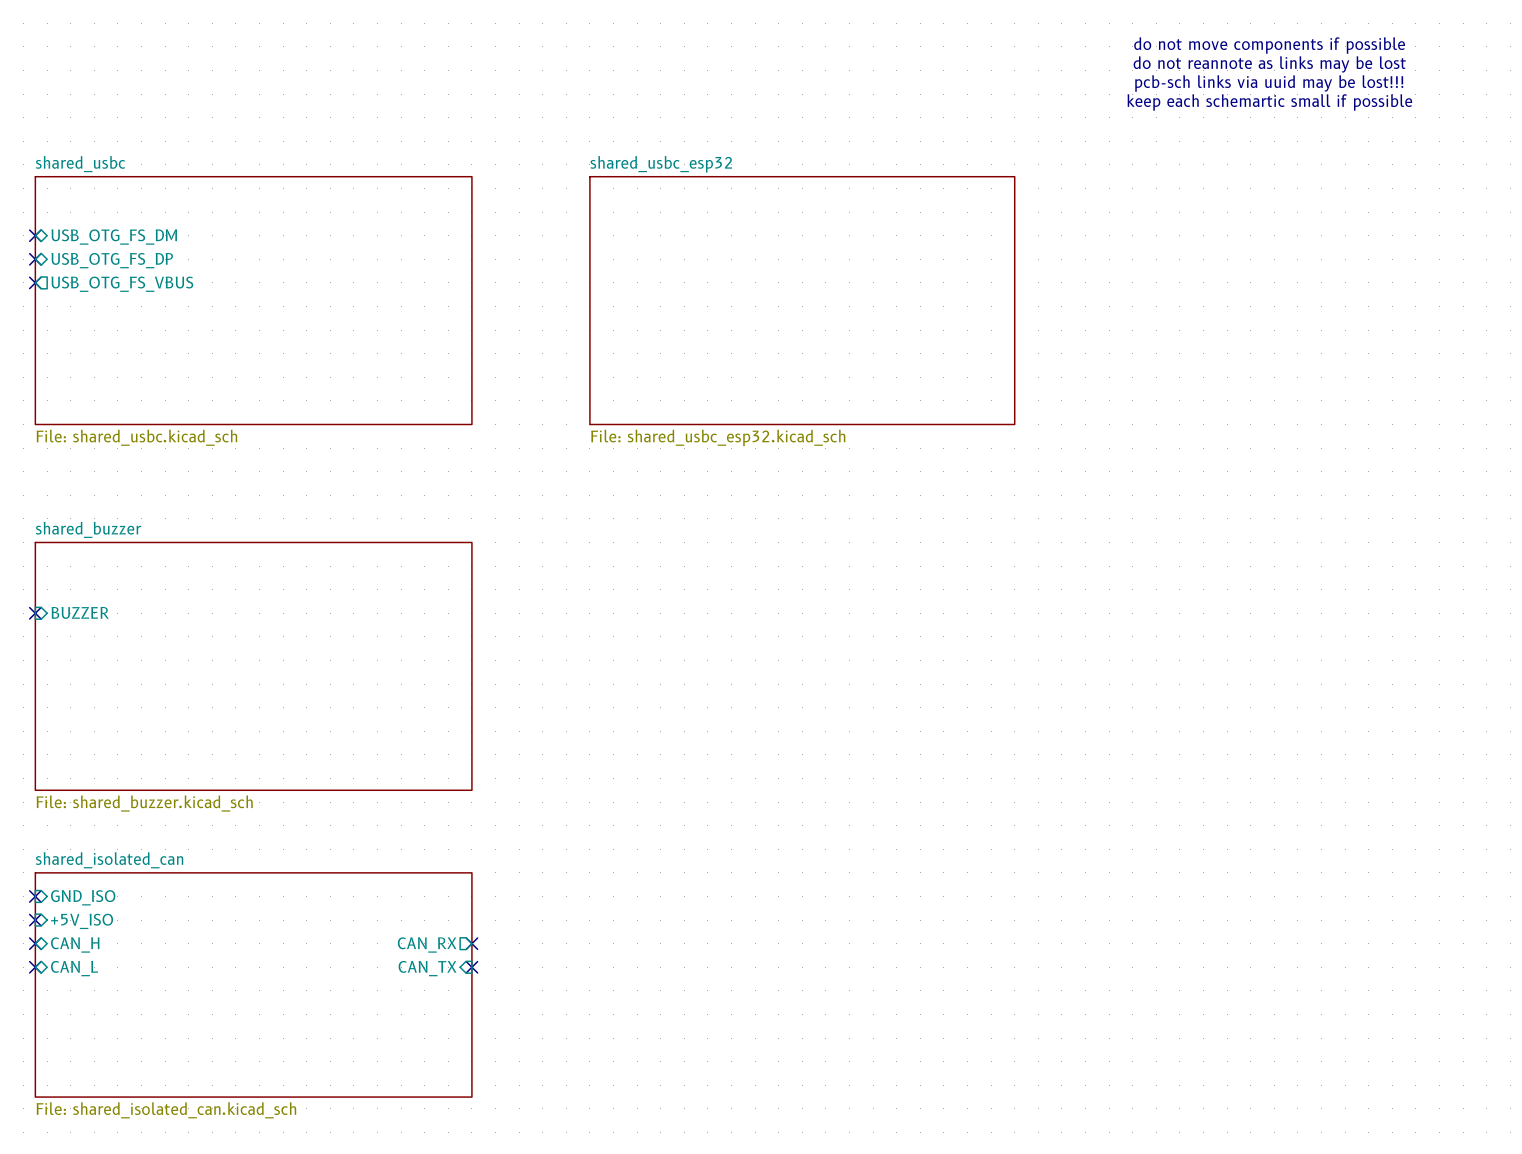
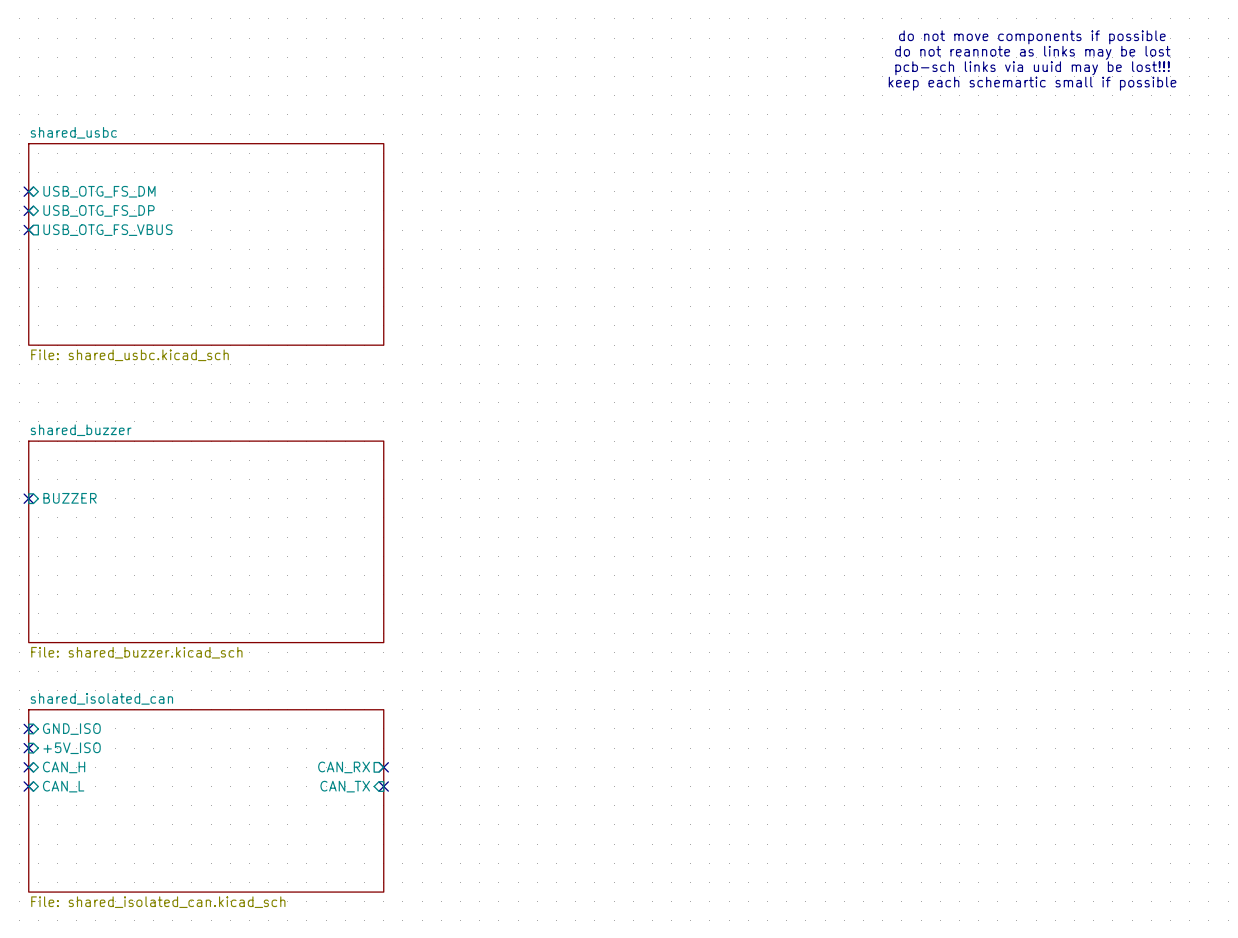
sheet shared_usbc_esp32: File: shared_usbc_esp32.kicad_sch (802, 300) -> none

